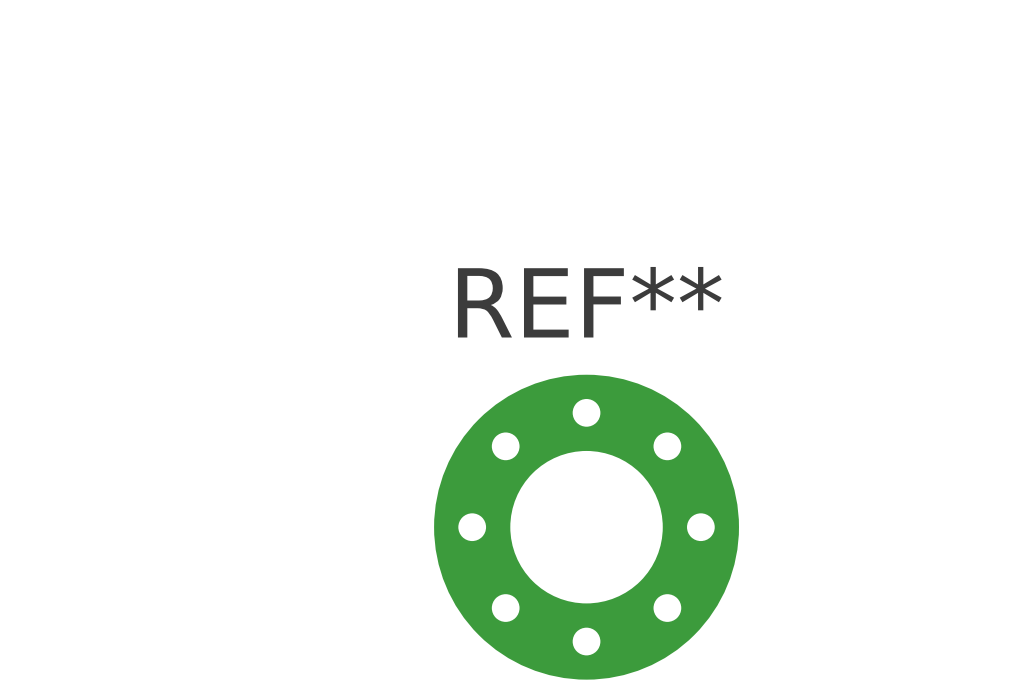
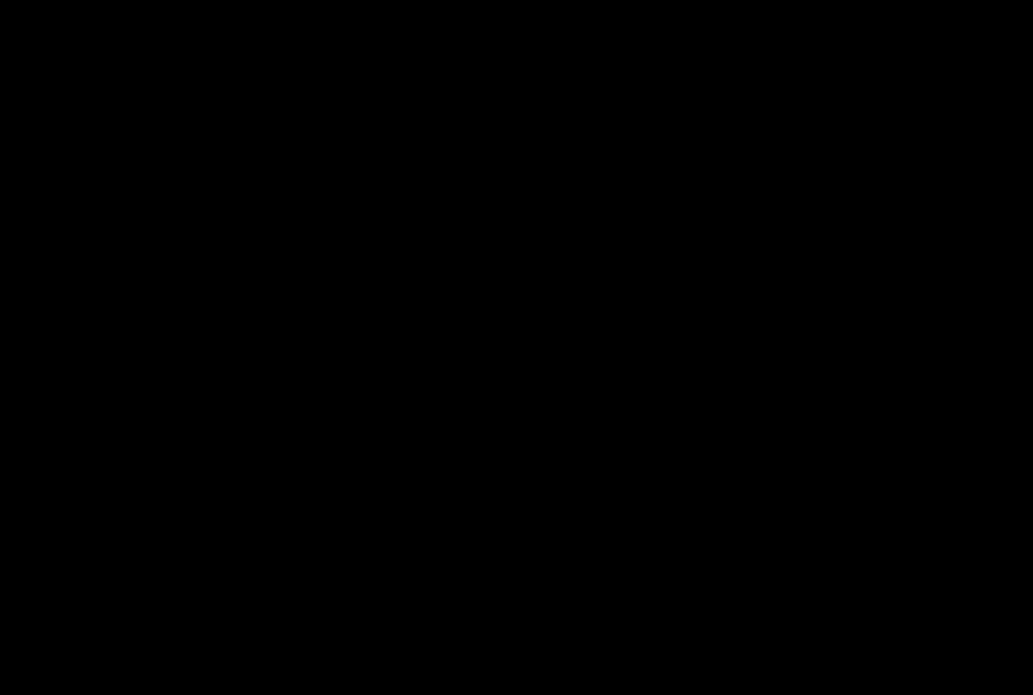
REF**: (586, 527) -> none

